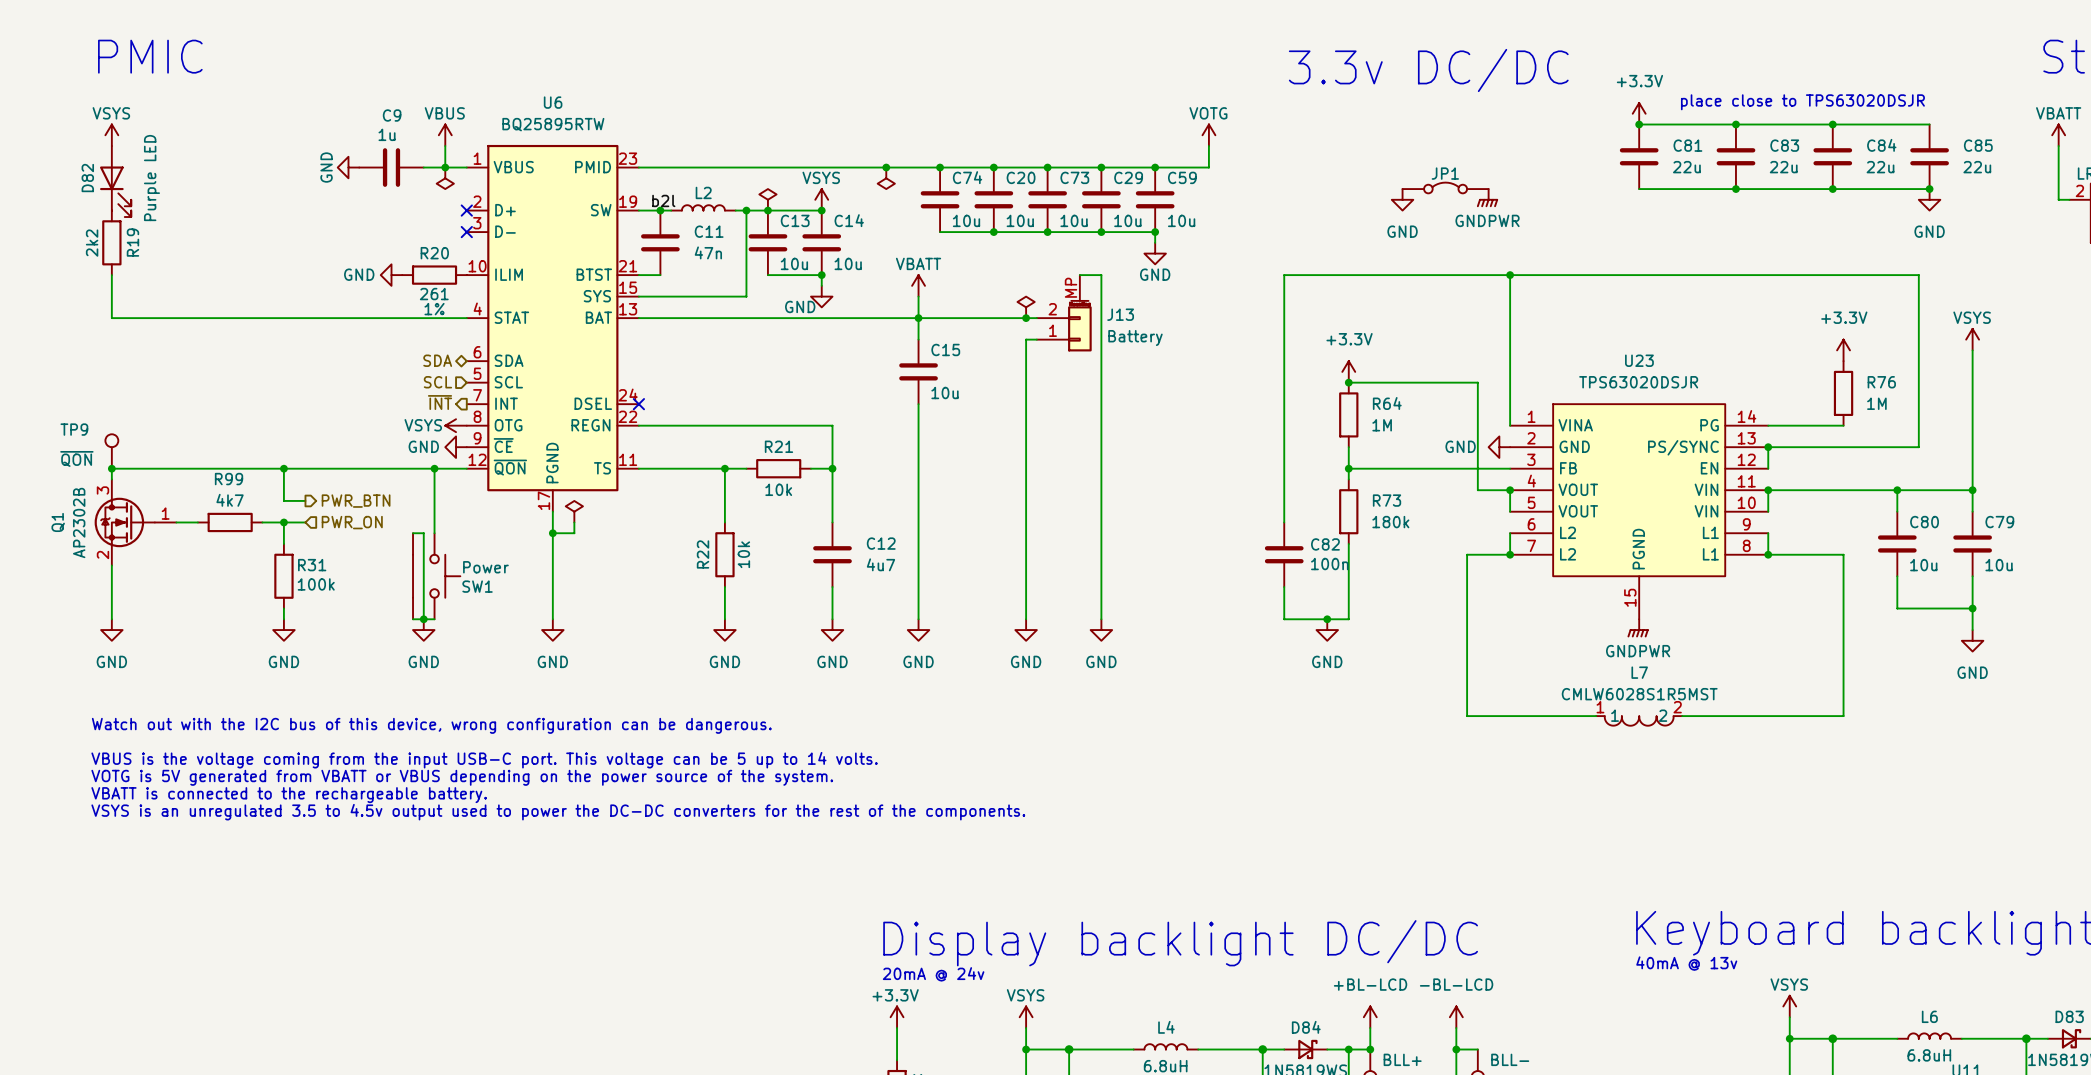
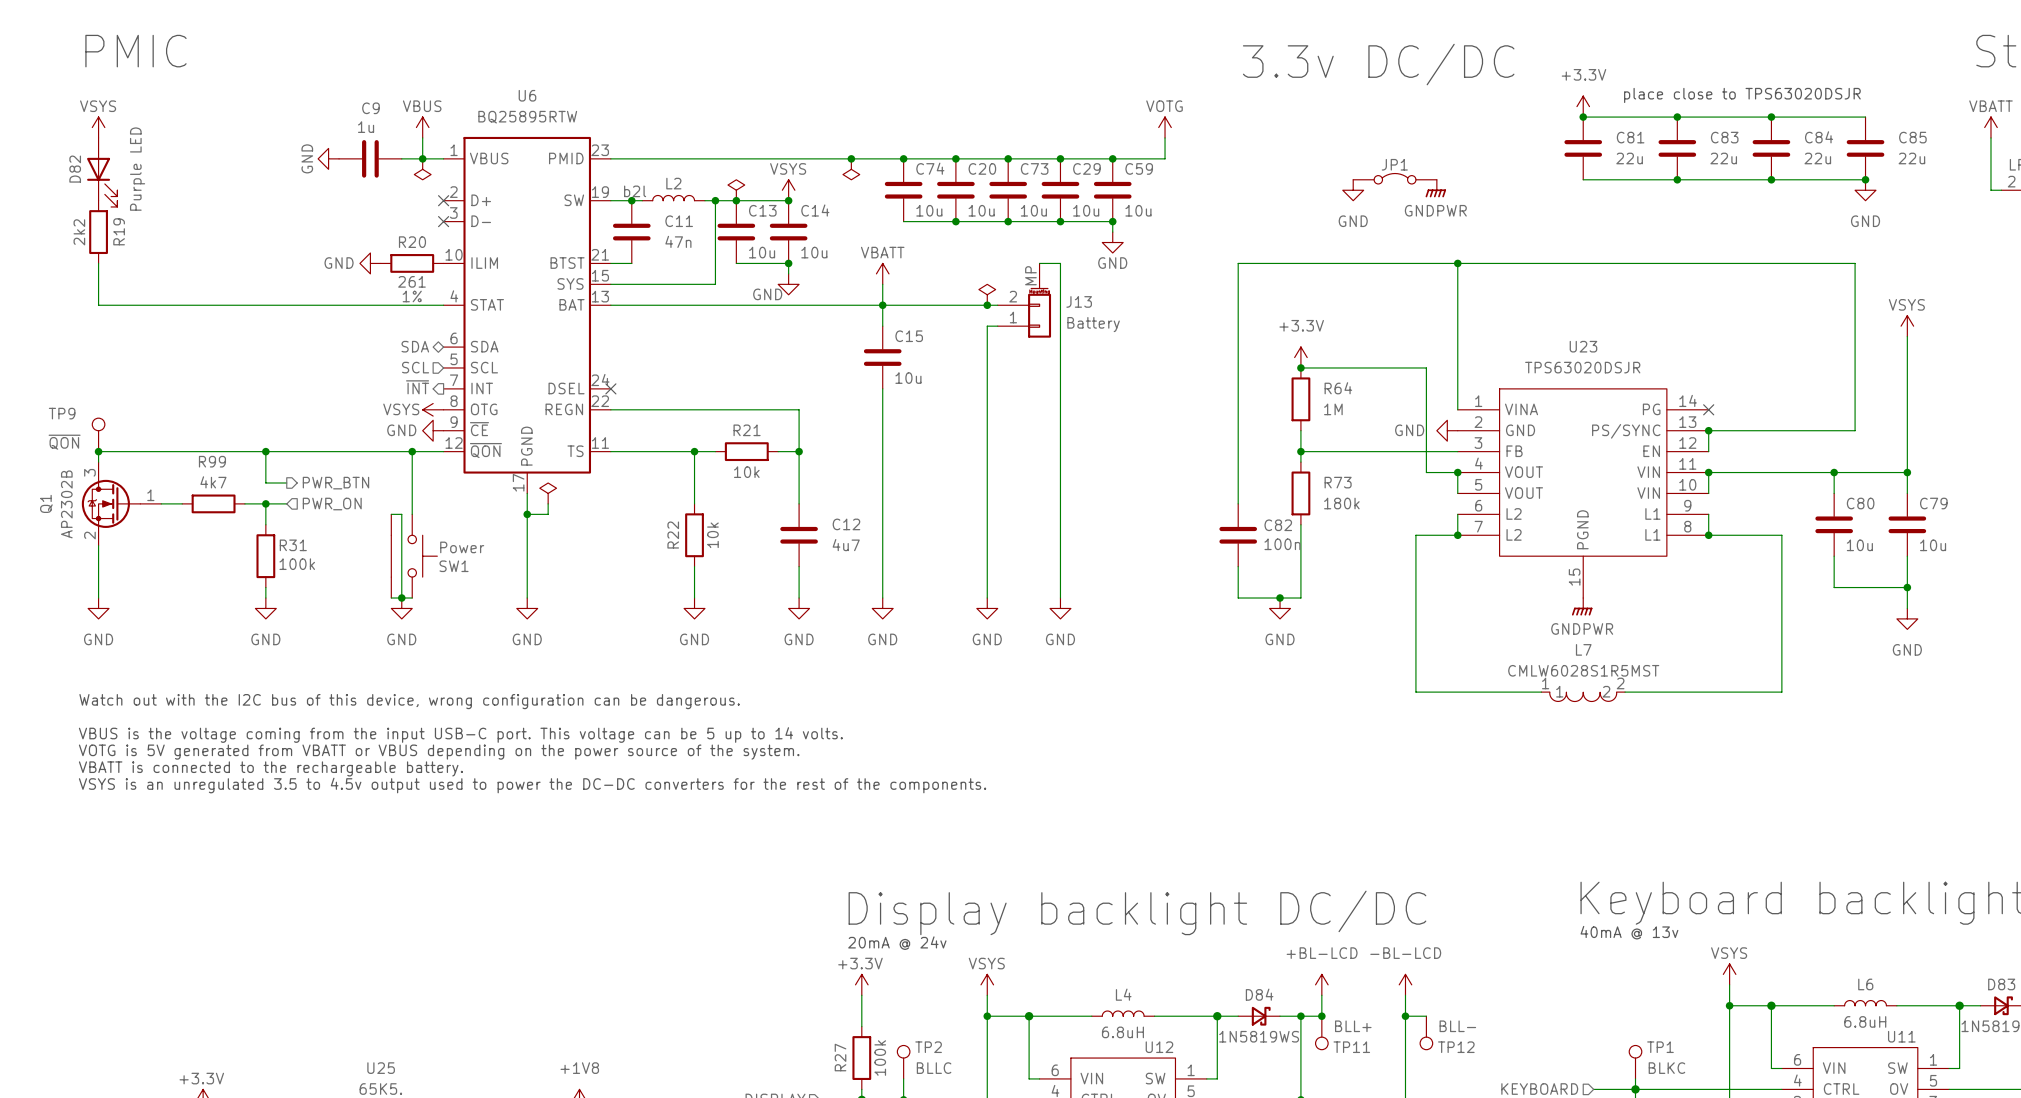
power symbol: +3.3V (1843, 350) -> none
R76: 1M (1843, 393) -> none
wire: (1768, 425) (1843, 425) -> none
no-connect mark: none -> (1708, 409)

